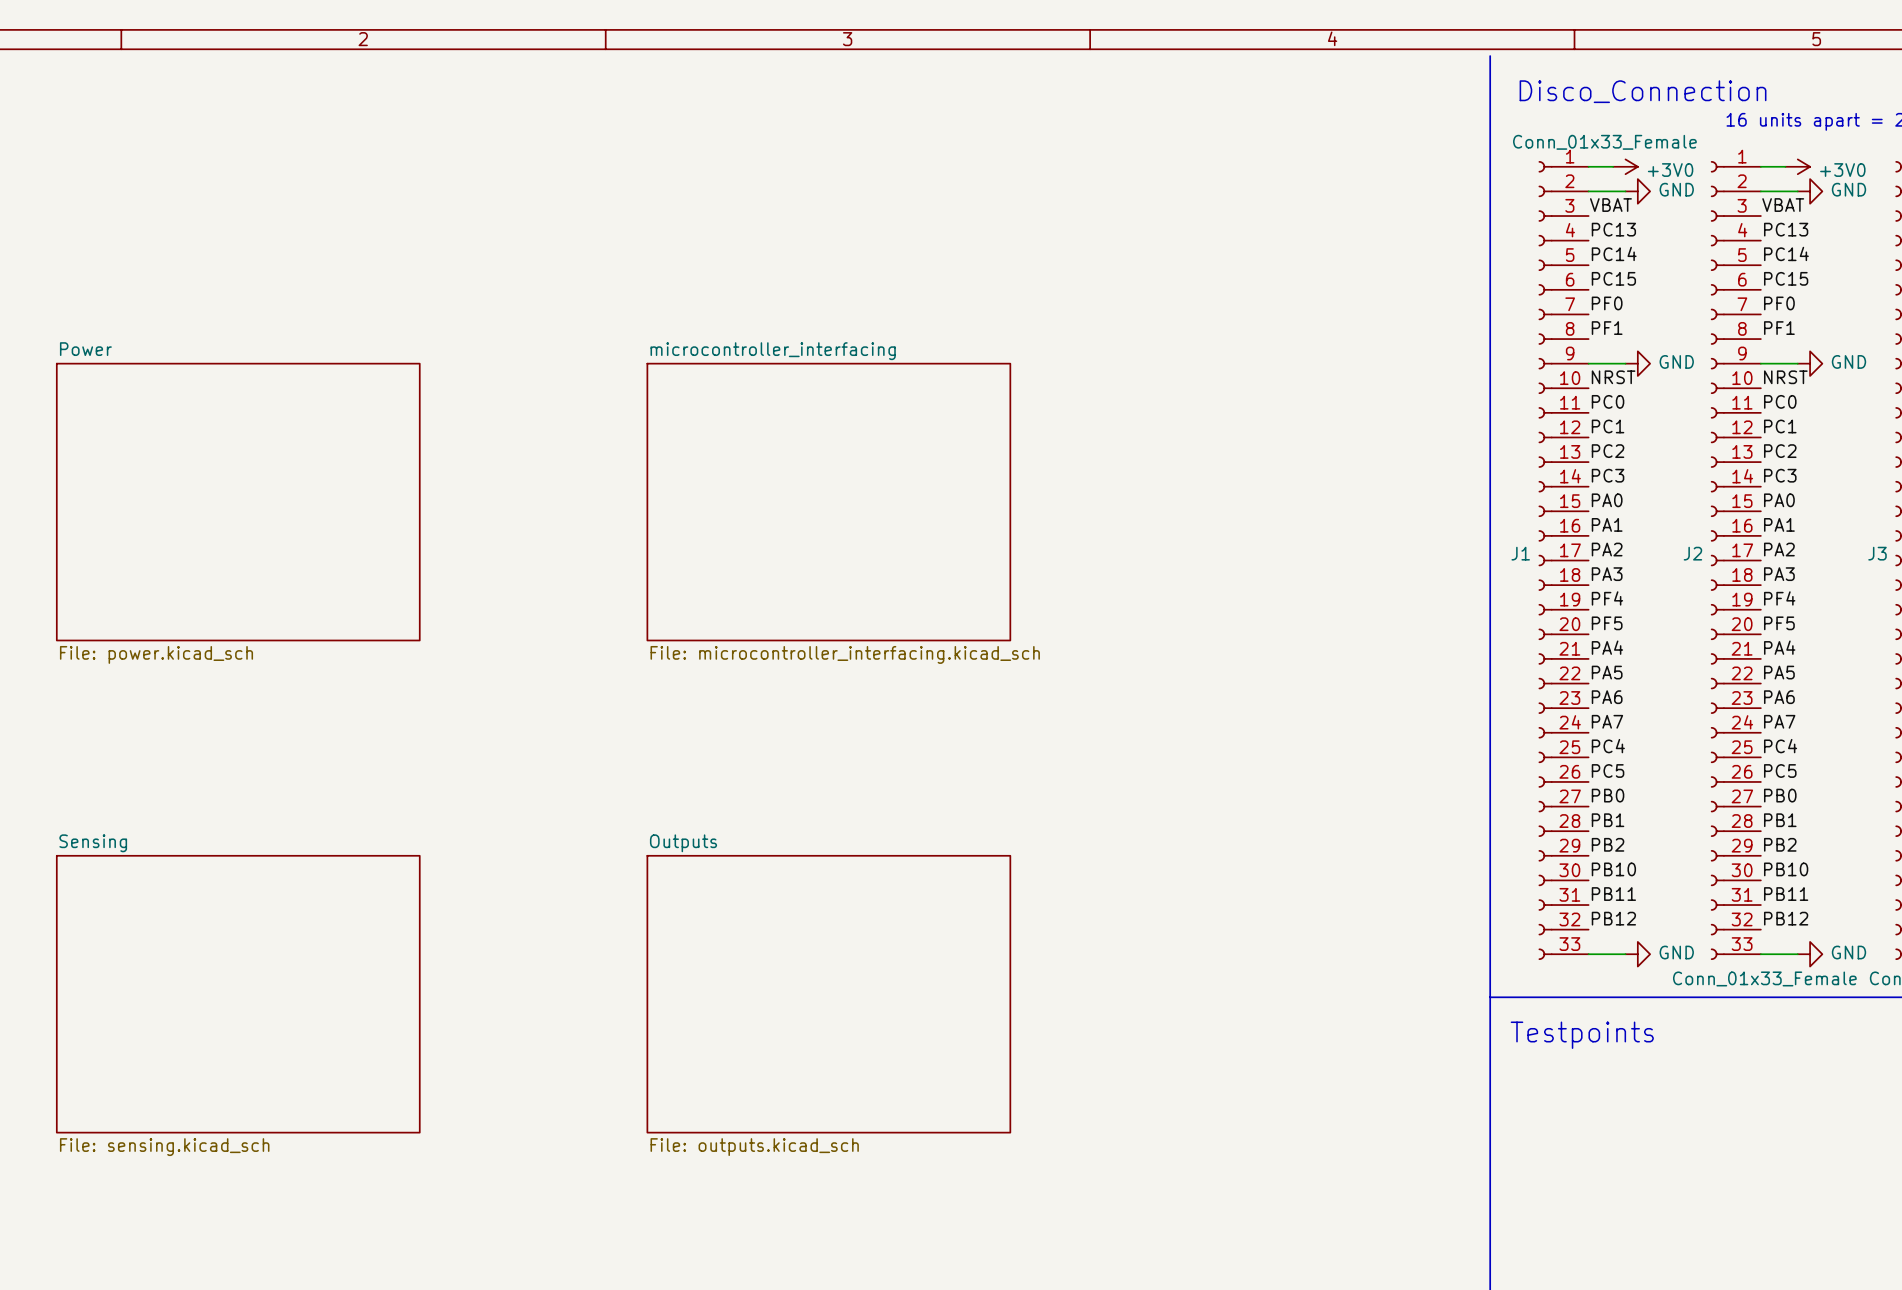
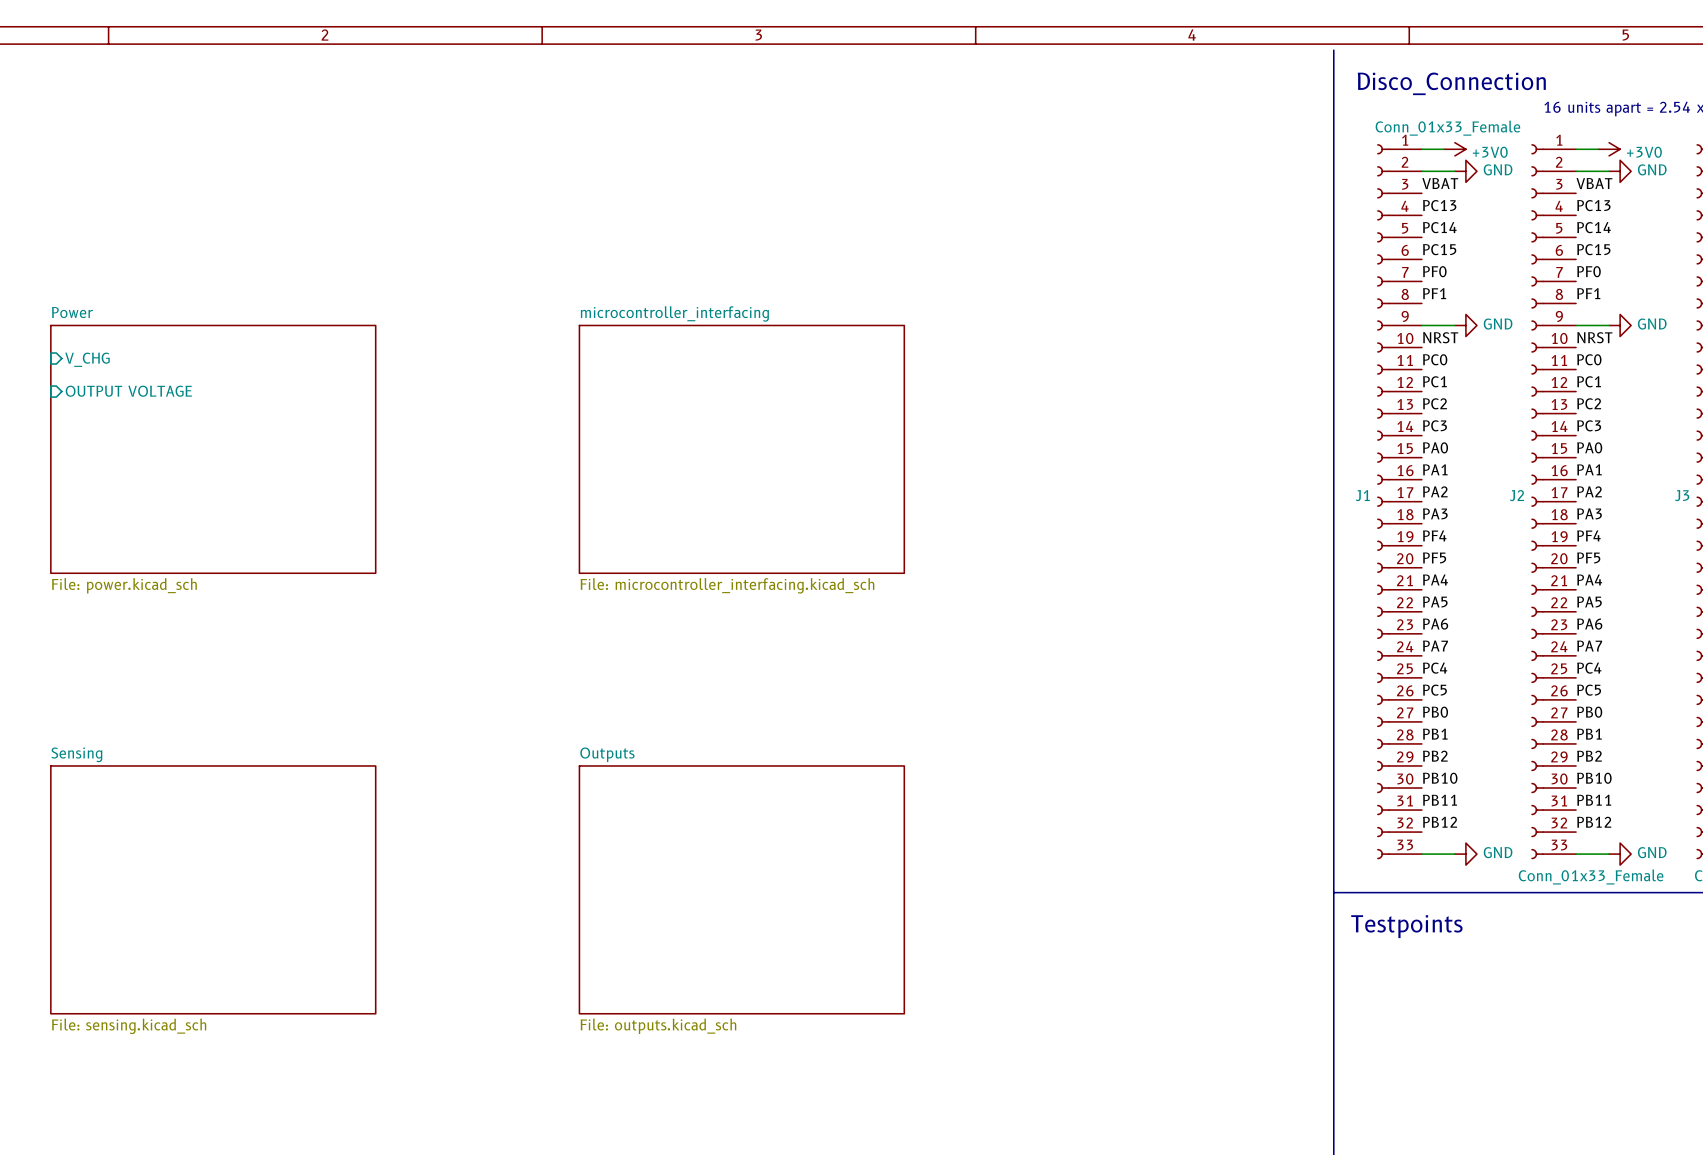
sheet pin: none -> V_CHG (87, 359)
sheet pin: none -> OUTPUT VOLTAGE (128, 391)

